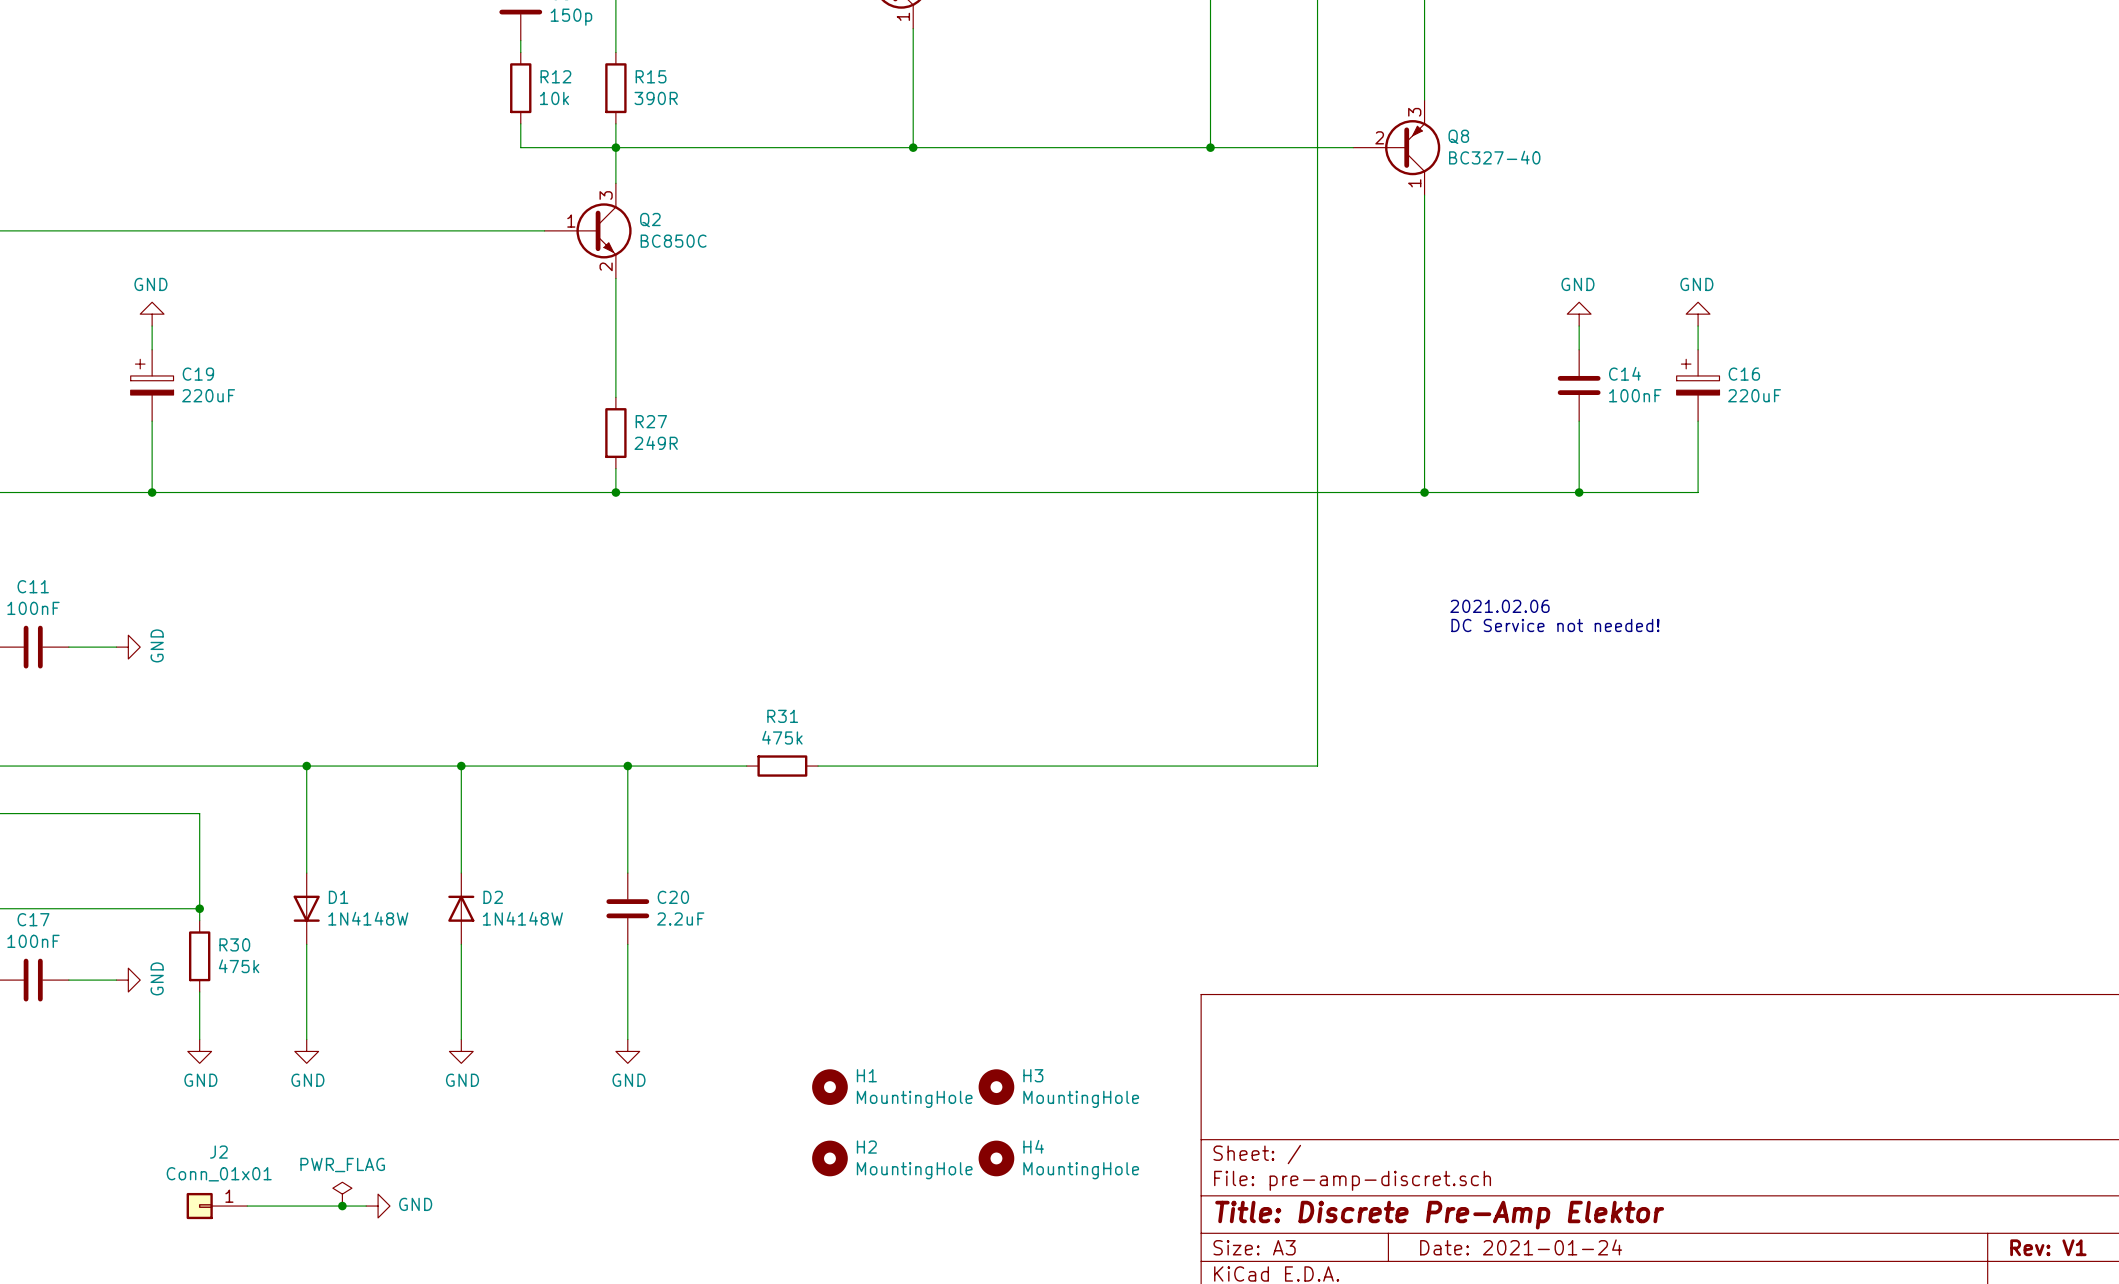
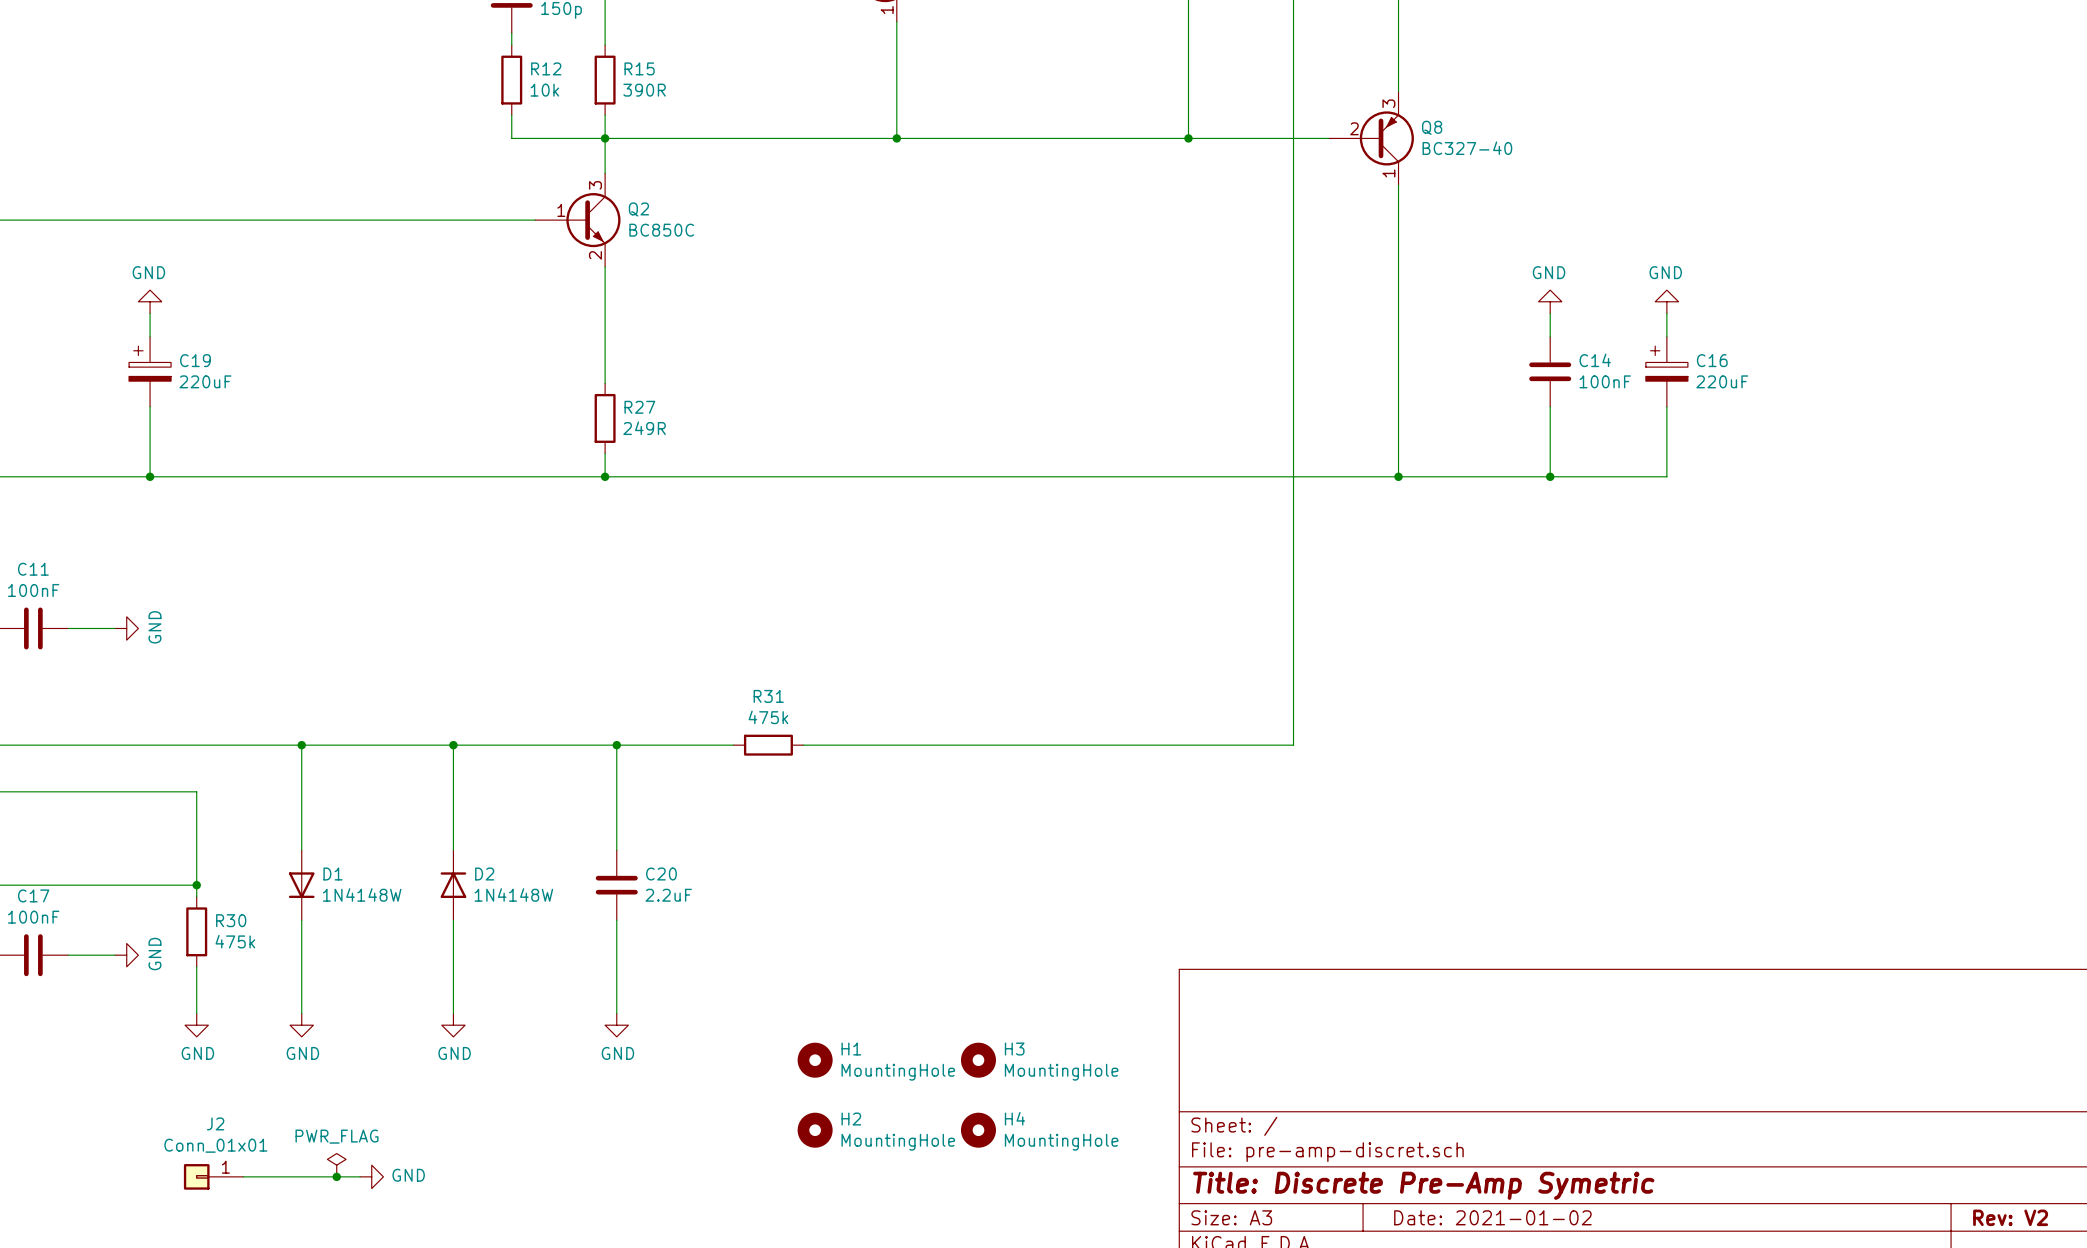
text: 2021.02.06 (1499, 606) -> none
text: DC Service not needed! (1555, 625) -> none
title block: Title: Discrete Pre-Amp Elektor (1439, 1215) -> Title: Discrete Pre-Amp Symetric (1423, 1185)
title block: Date: 2021-01-24 (1521, 1247) -> Date: 2021-01-02 (1492, 1217)
title block: Rev: V1 (2048, 1247) -> Rev: V2 (2010, 1217)

